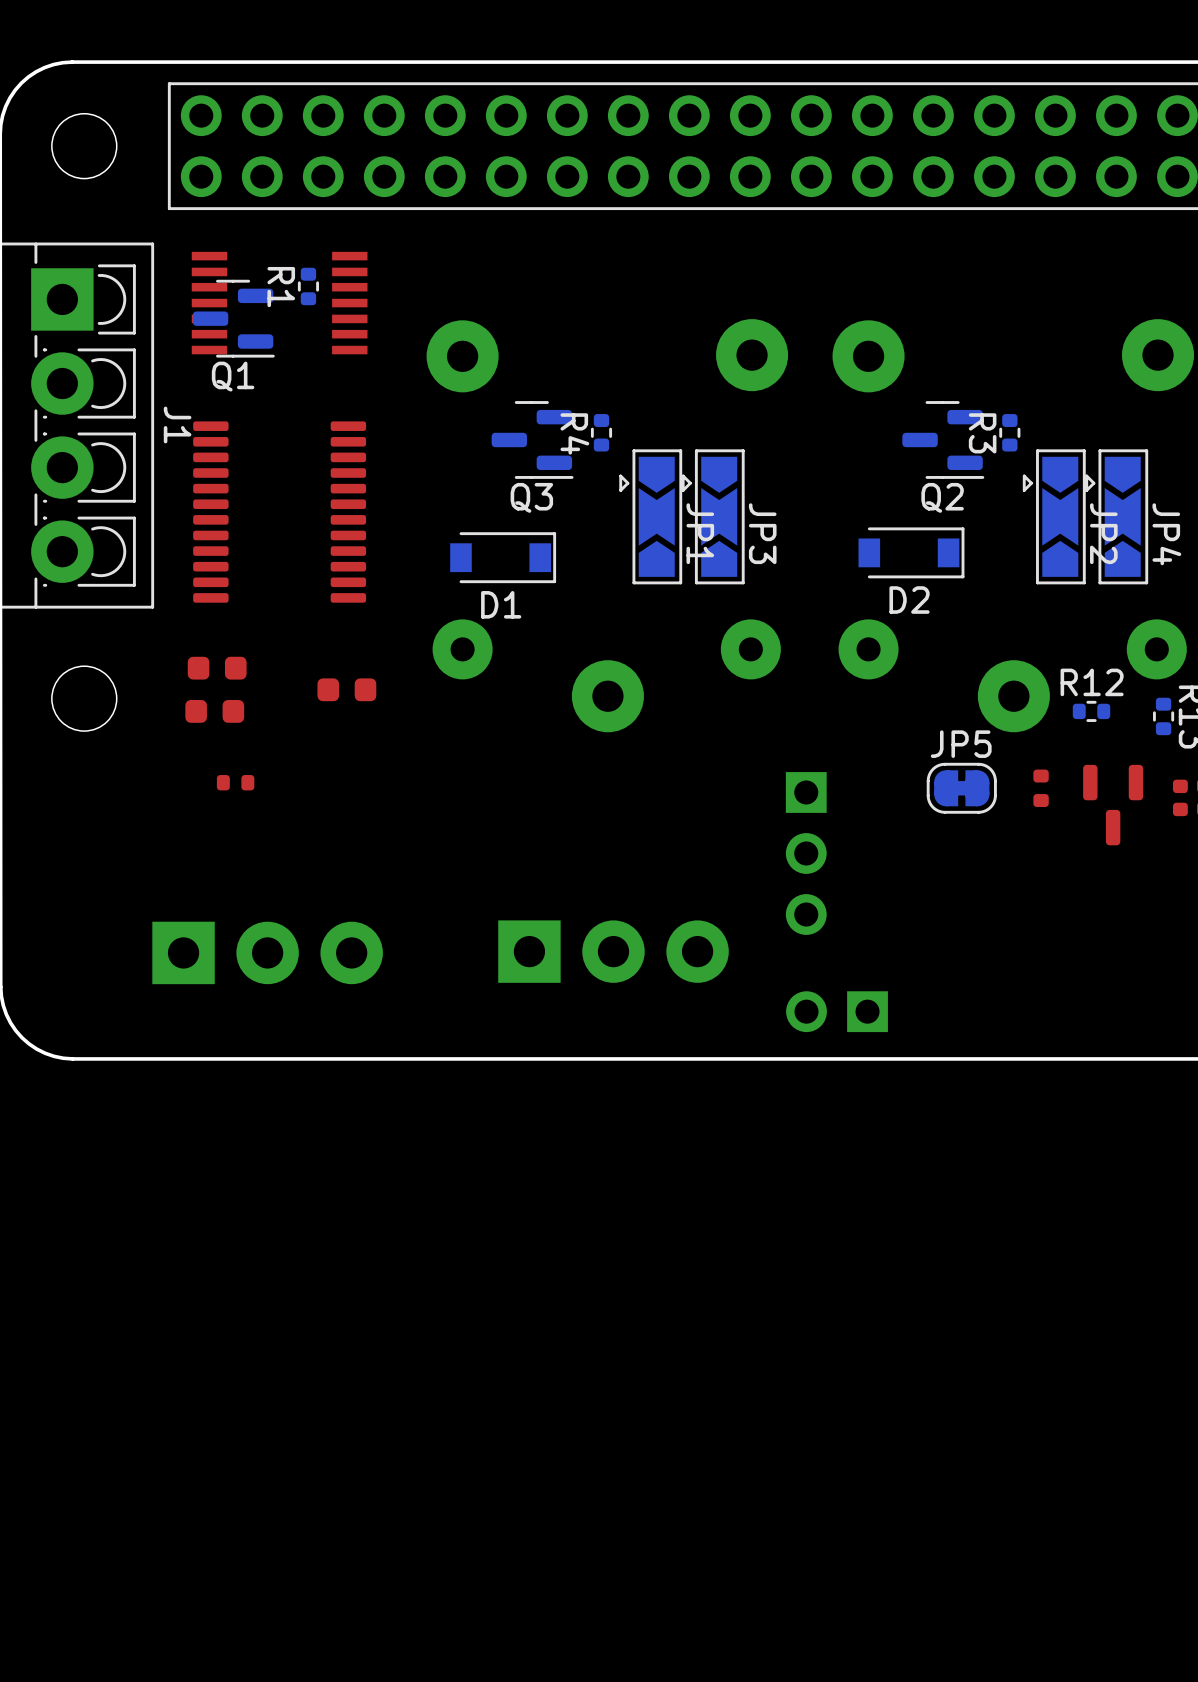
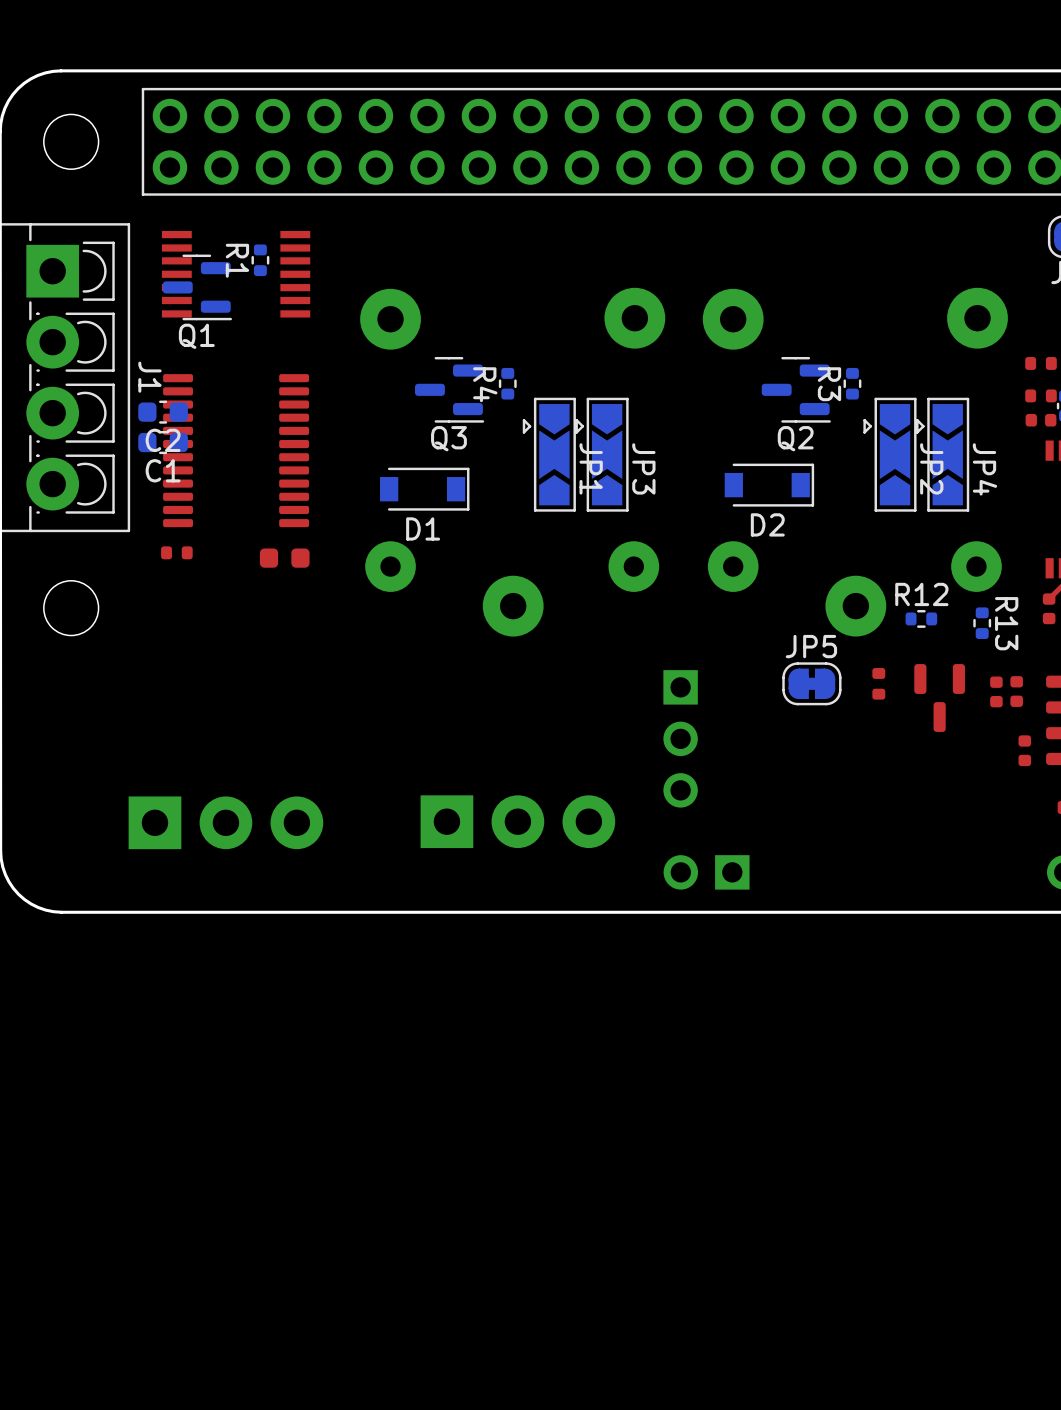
C1 side: top (217, 668) -> bottom (163, 442)
part position: (346, 689) -> (284, 558)
C2 side: top (214, 711) -> bottom (163, 412)
part position: (235, 782) -> (176, 552)

